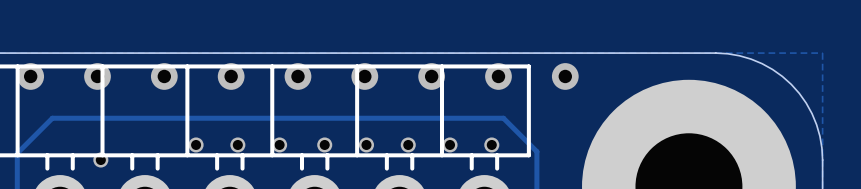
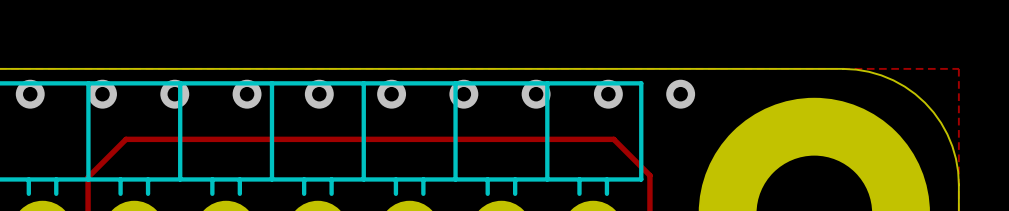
via: (196, 144) -> none
via: (237, 144) -> none
via: (279, 144) -> none
via: (324, 144) -> none
via: (366, 144) -> none
via: (408, 144) -> none
via: (450, 144) -> none
via: (491, 144) -> none
via: (100, 160) -> none

